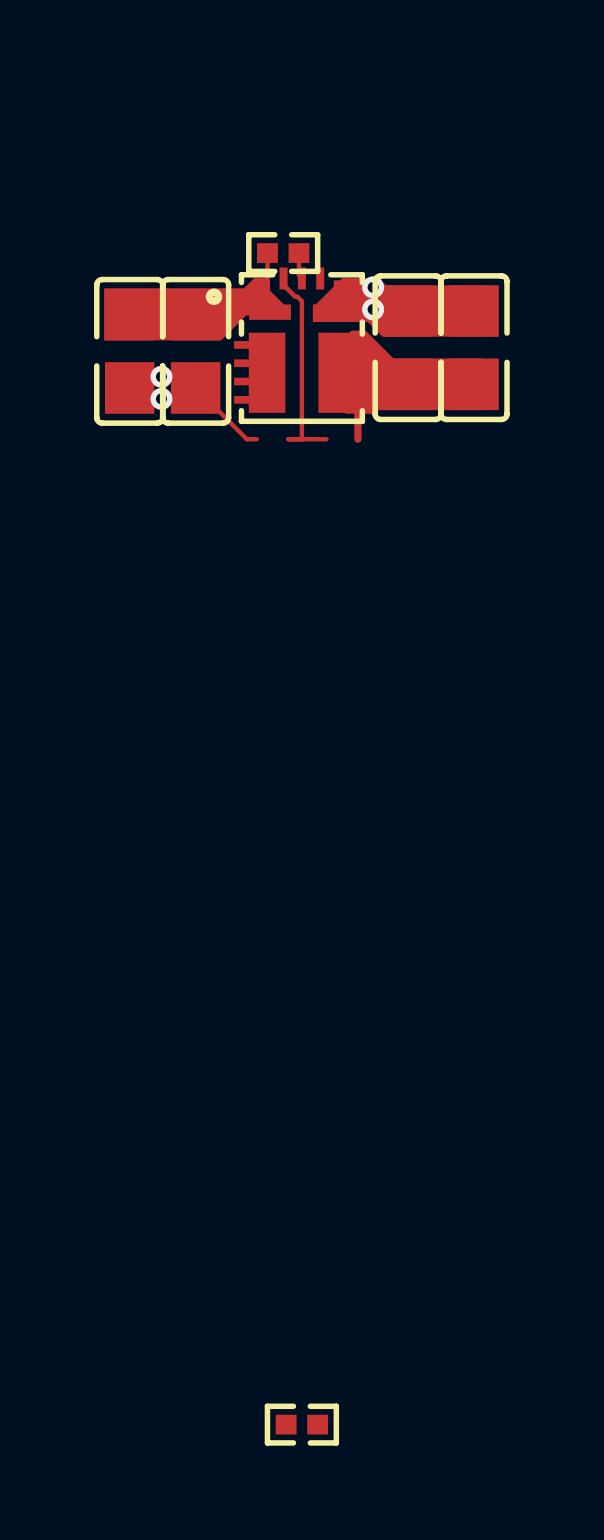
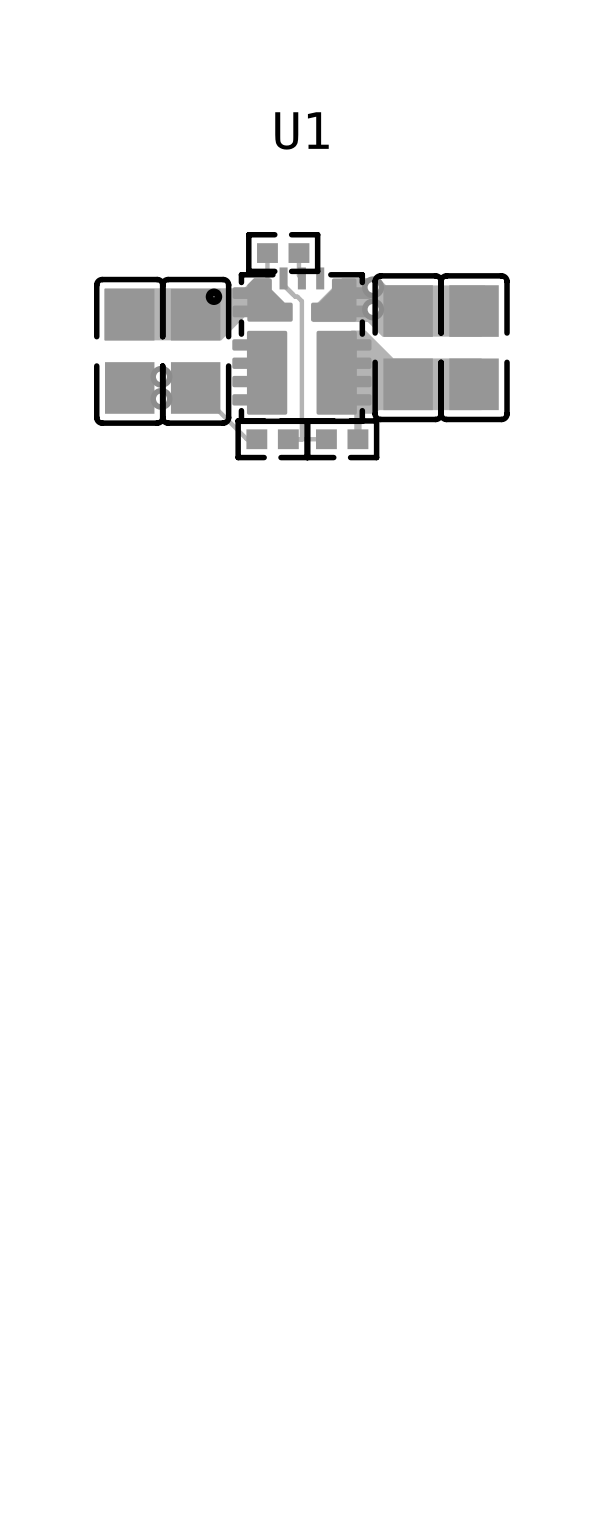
part: (287, 345) -> none
U1: none -> (288, 345)
part: none -> (272, 439)
part: none -> (342, 439)
part: (301, 1424) -> none

